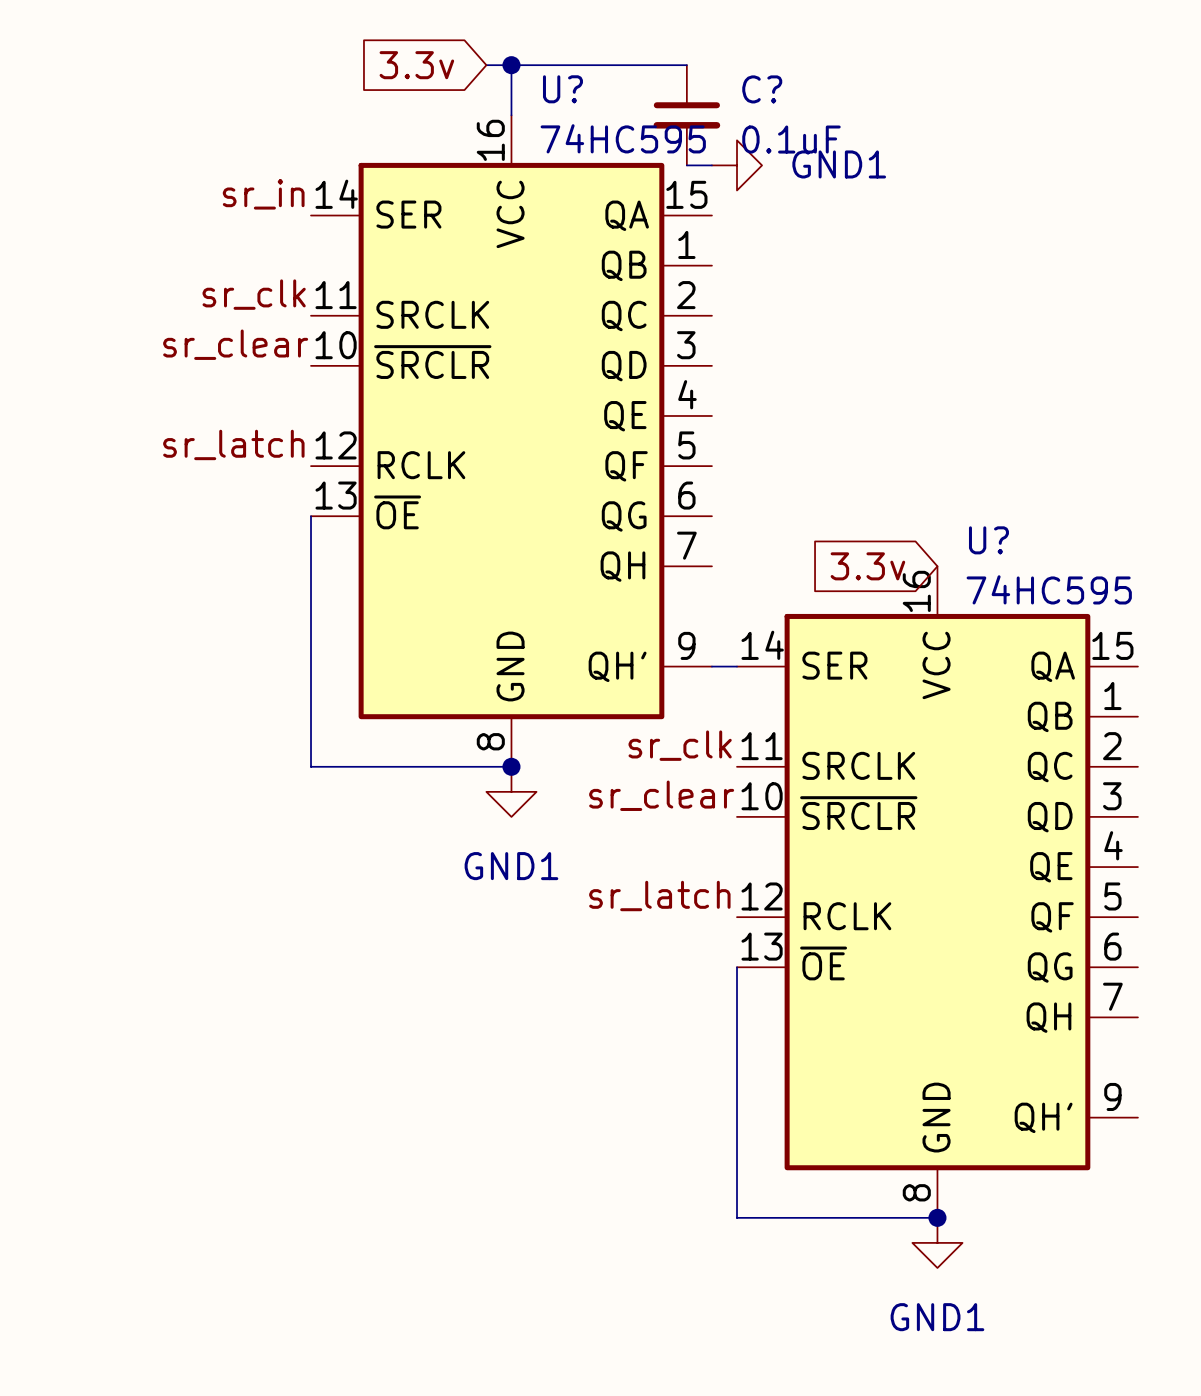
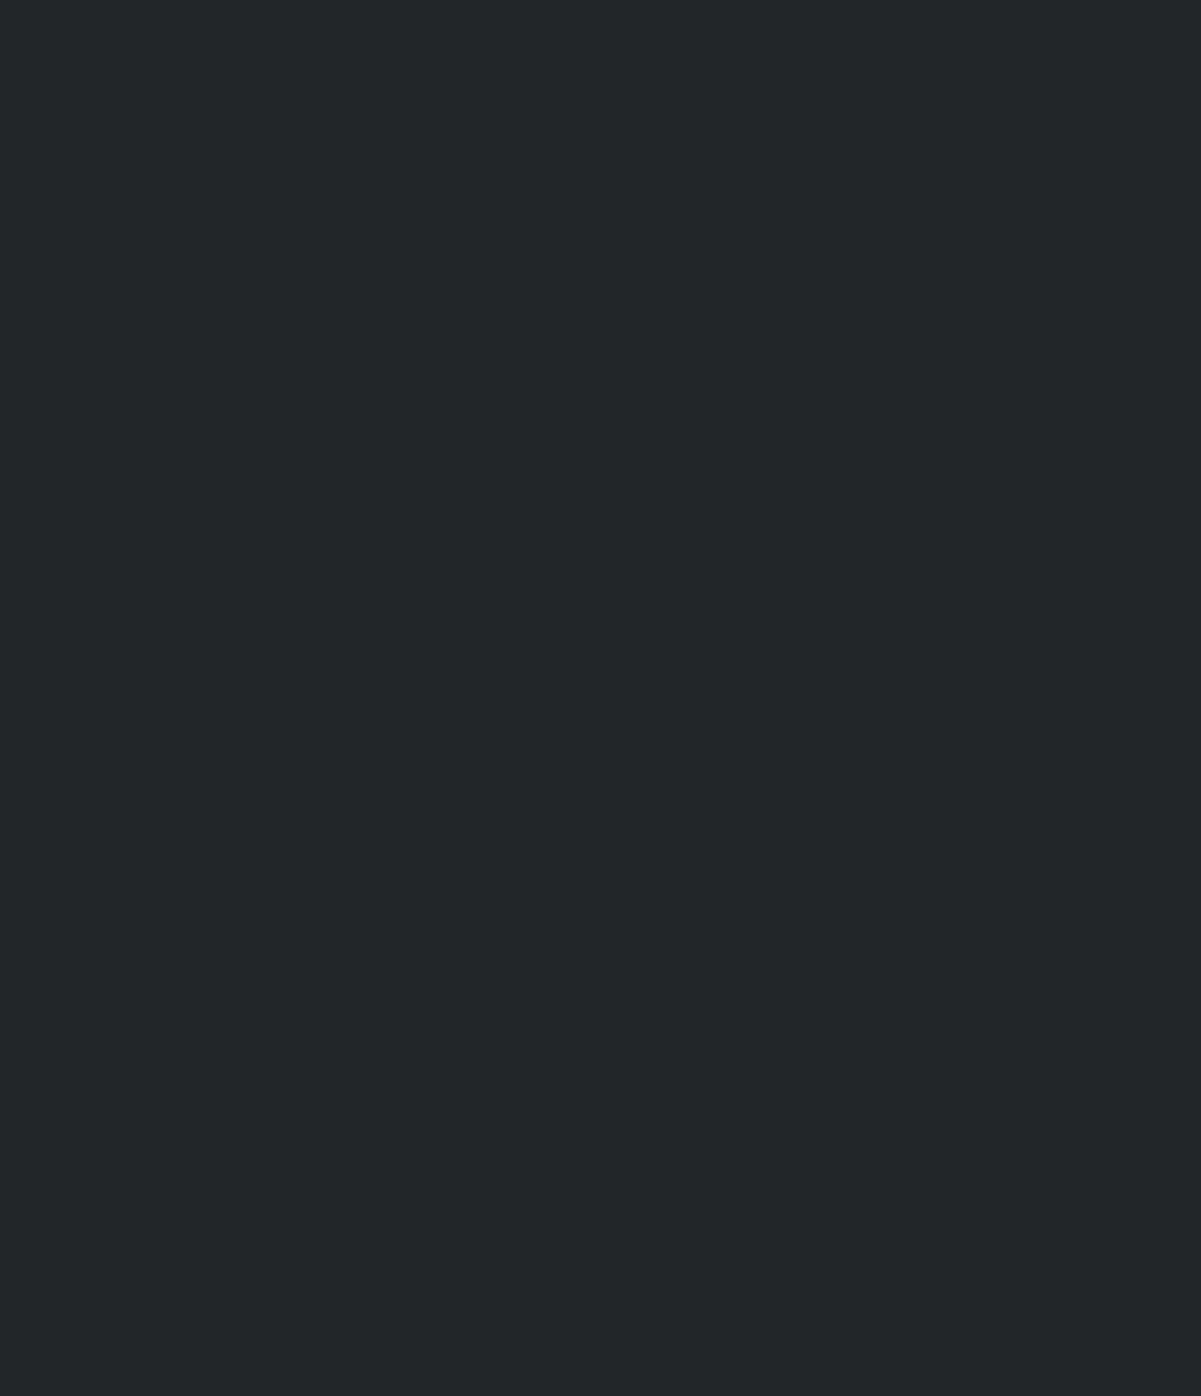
global label: 3.3v (416, 65) -> none
wire: (486, 65) (686, 65) -> none
wire: (511, 65) (511, 115) -> none
junction: (511, 65) -> none
C?: 0.1uF (686, 115) -> none
wire: (686, 165) (711, 165) -> none
power symbol: GND1 (737, 165) -> none
label: sr_in (263, 194) -> none
label: sr_clk (254, 294) -> none
label: sr_clear (235, 344) -> none
U?: 74HC595 (511, 441) -> none
label: sr_latch (233, 444) -> none
wire: (311, 516) (311, 766) (511, 766) -> none
global label: 3.3v (867, 566) -> none
wire: (711, 666) (737, 666) -> none
label: sr_clk (680, 745) -> none
junction: (511, 766) -> none
power symbol: GND1 (511, 791) -> none
label: sr_clear (661, 795) -> none
U?: 74HC595 (937, 892) -> none
label: sr_latch (659, 895) -> none
wire: (737, 967) (737, 1217) (937, 1217) -> none
junction: (937, 1217) -> none
power symbol: GND1 (937, 1242) -> none

